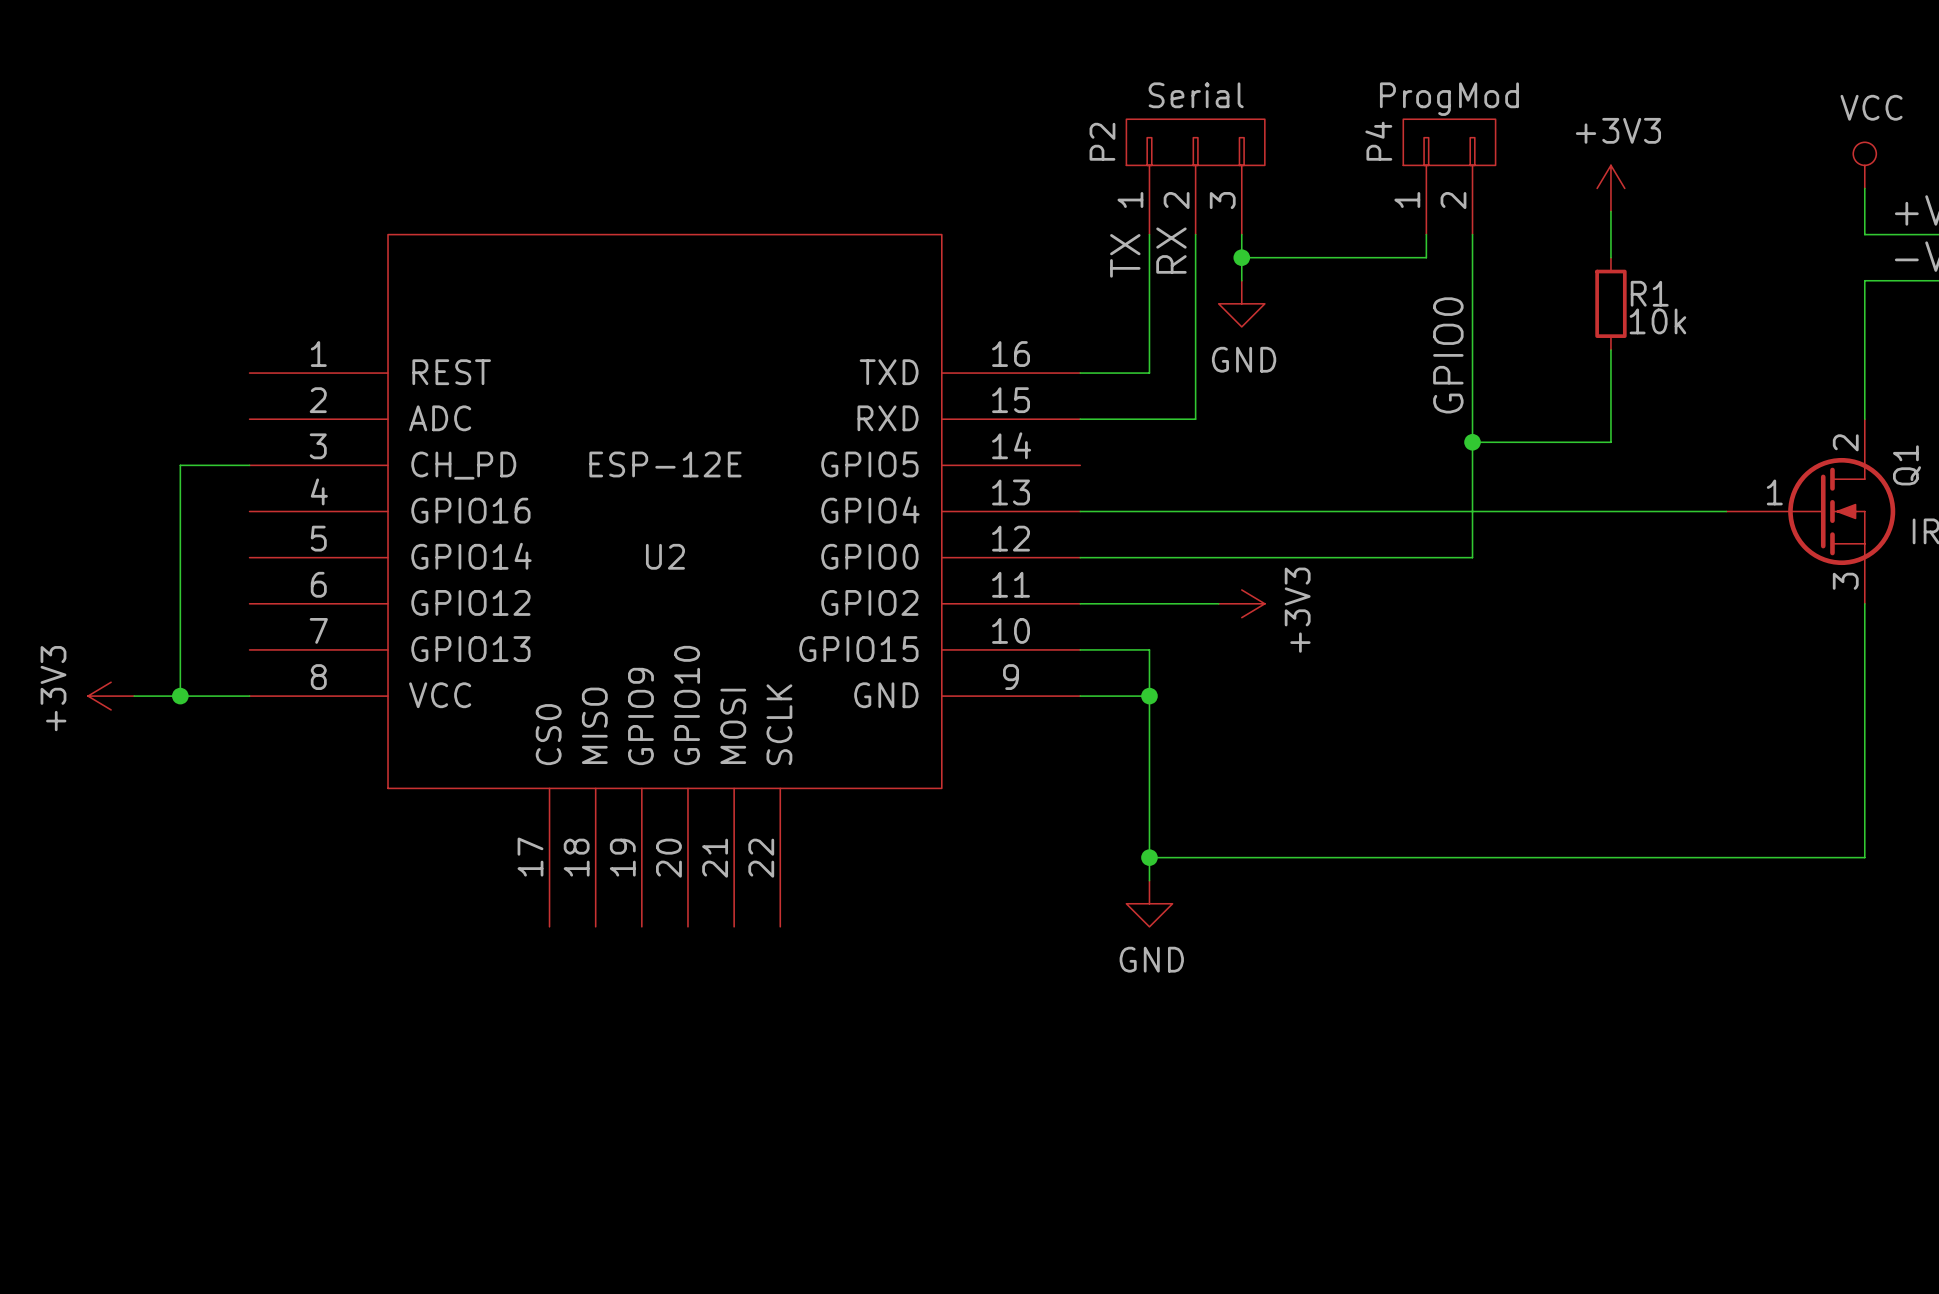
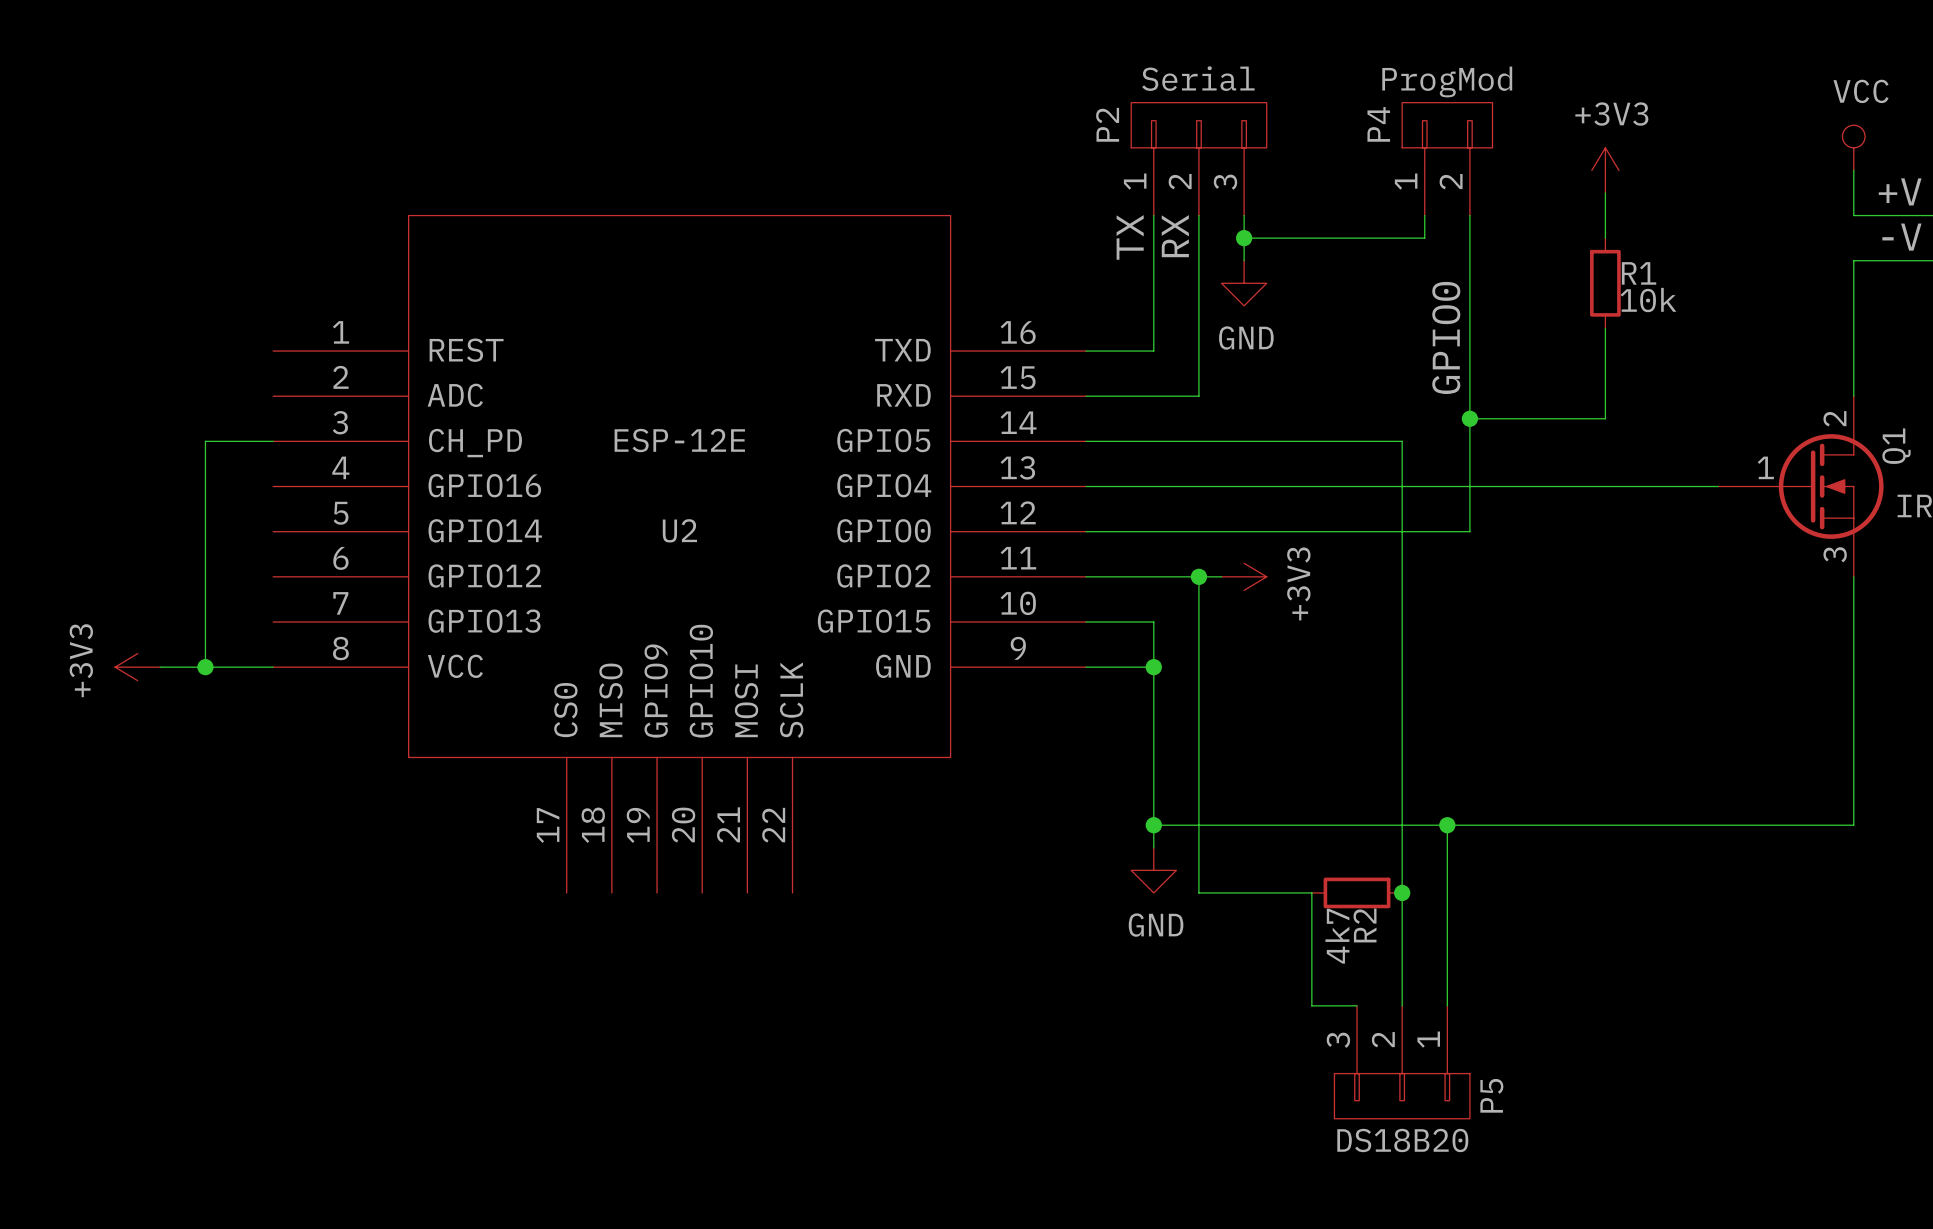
wire: none -> (1086, 441) (1402, 441) (1402, 1005)
wire: none -> (1198, 576) (1198, 892) (1311, 892) (1311, 1005) (1357, 1005)
junction: none -> (1198, 576)
wire: none -> (1447, 825) (1447, 1005)
junction: none -> (1447, 825)
R2: none -> 4k7 (1357, 892)
junction: none -> (1402, 892)
P5: none -> DS18B20 (1402, 1062)

